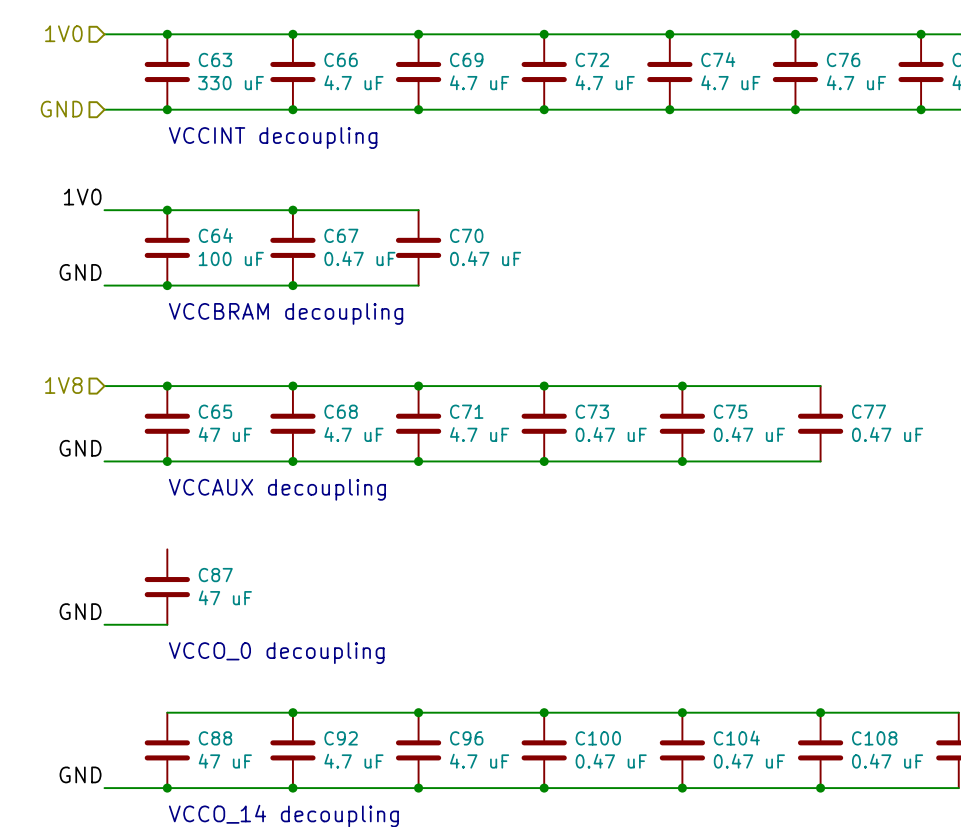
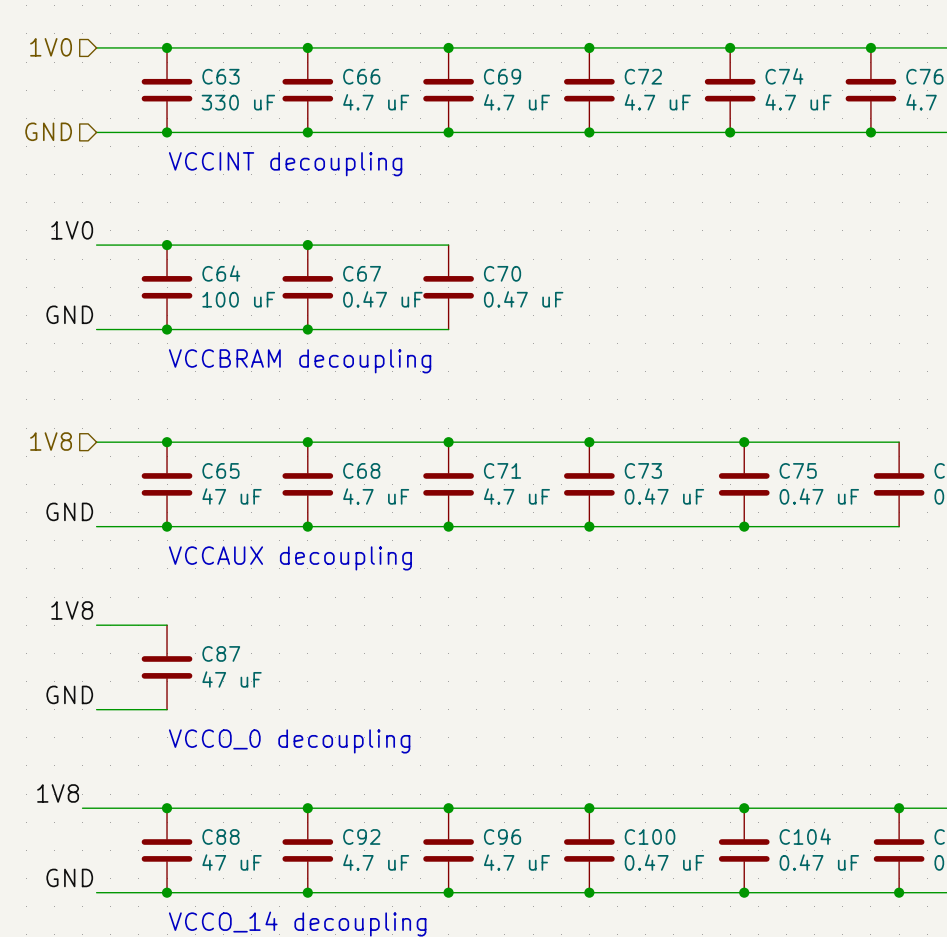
label: none -> 1V8 (72, 610)
wire: none -> (96, 625) (167, 625)
label: none -> 1V8 (58, 793)
wire: none -> (82, 808) (167, 808)
junction: none -> (167, 808)

